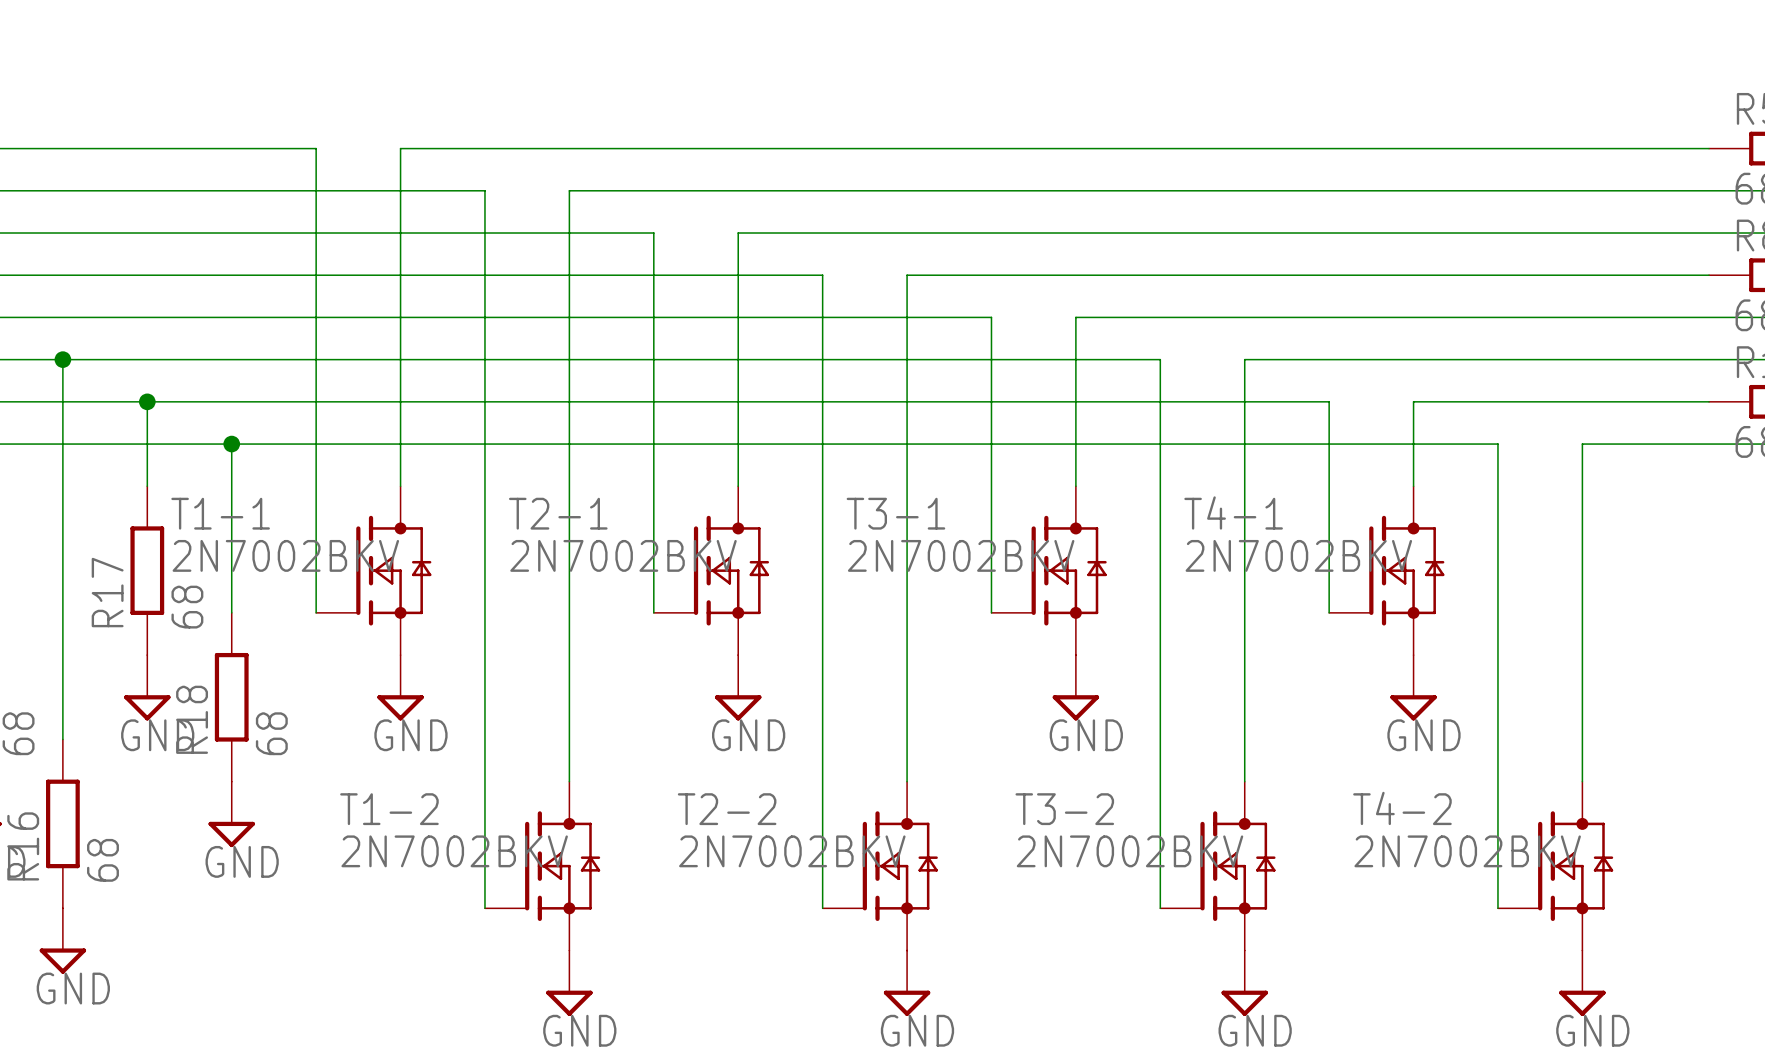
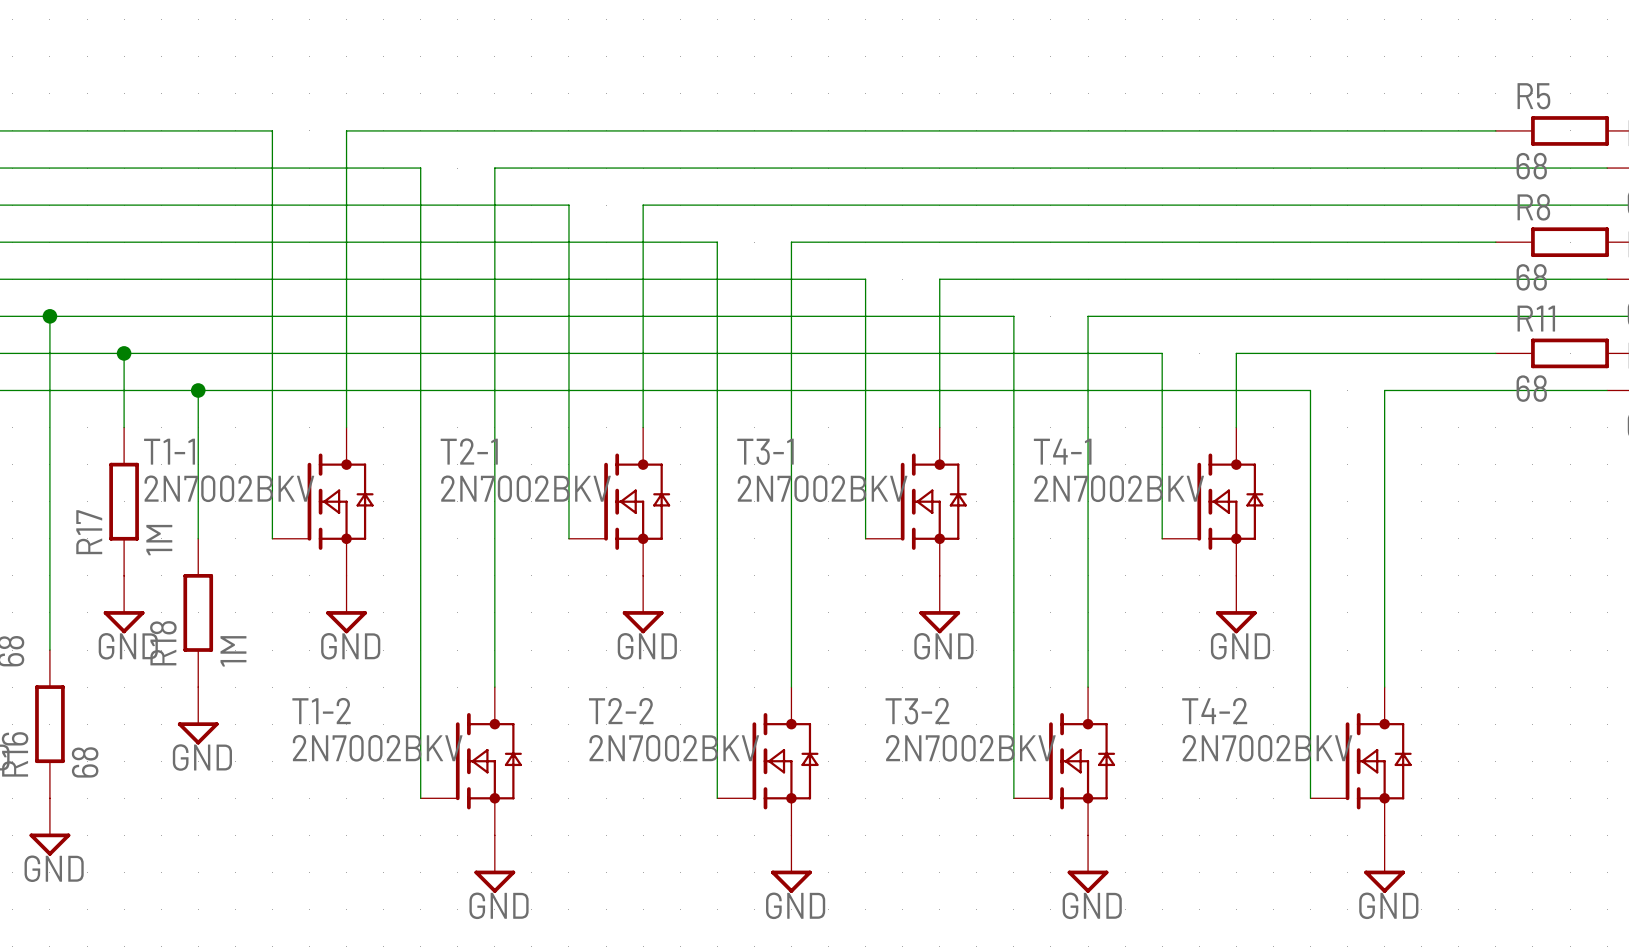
R17 value: 68 (187, 607) -> 1M (159, 540)
R18 value: 68 (271, 733) -> 1M (233, 651)

